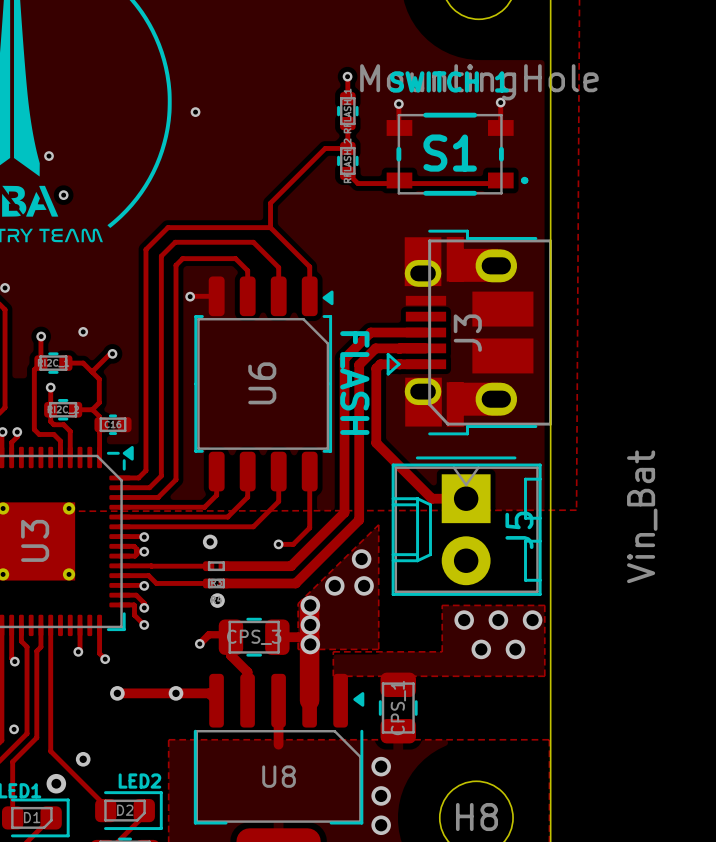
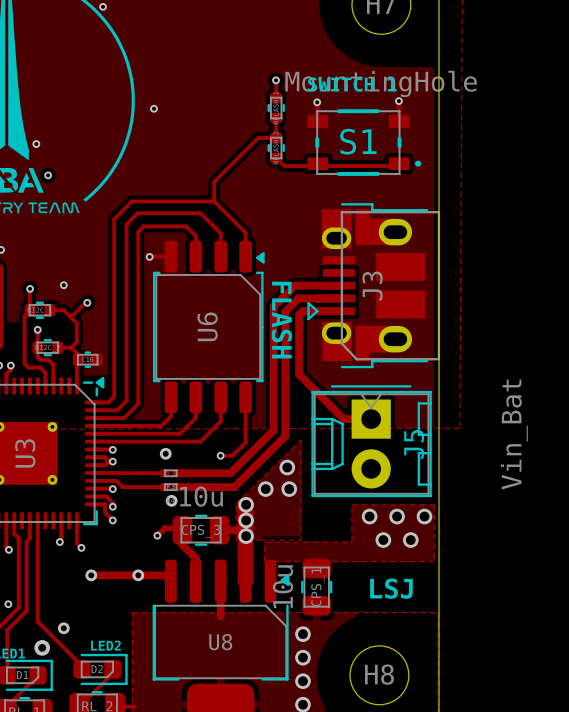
CPS_3 value: none -> 10u (201, 496)
CPS_1 value: none -> 10u (283, 586)
text: none -> LSJ (391, 588)

